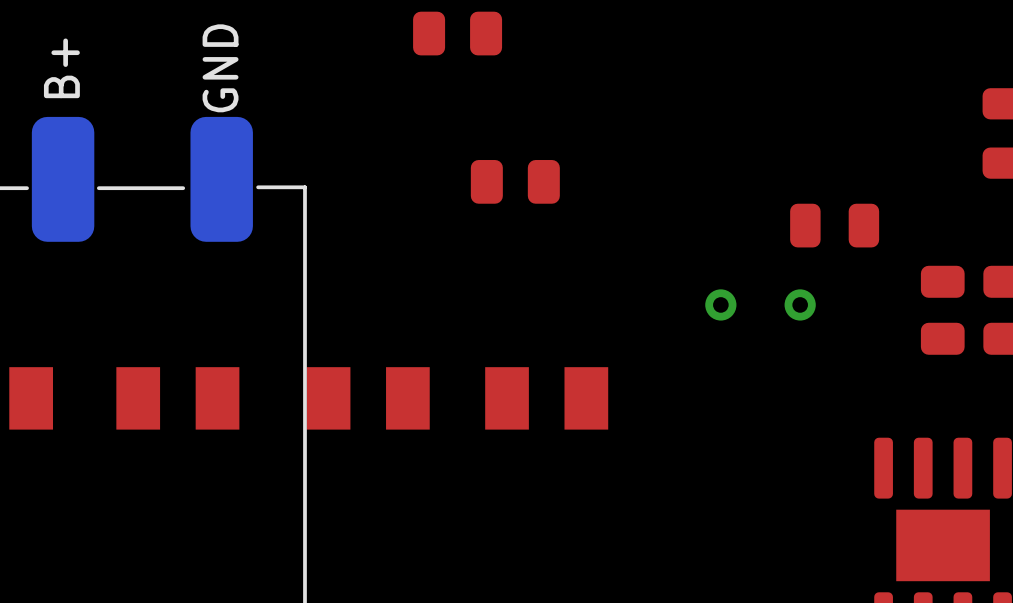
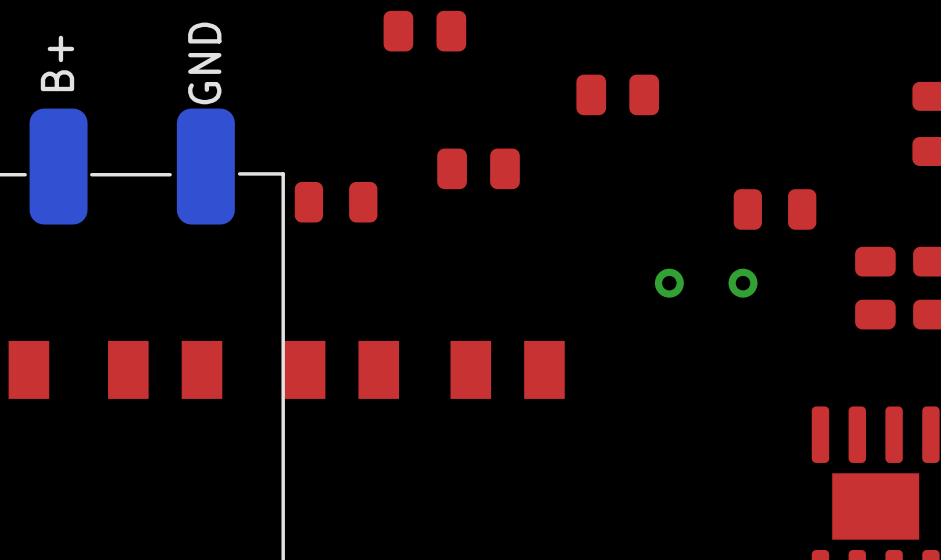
part: none -> (617, 94)
part: none -> (336, 202)

